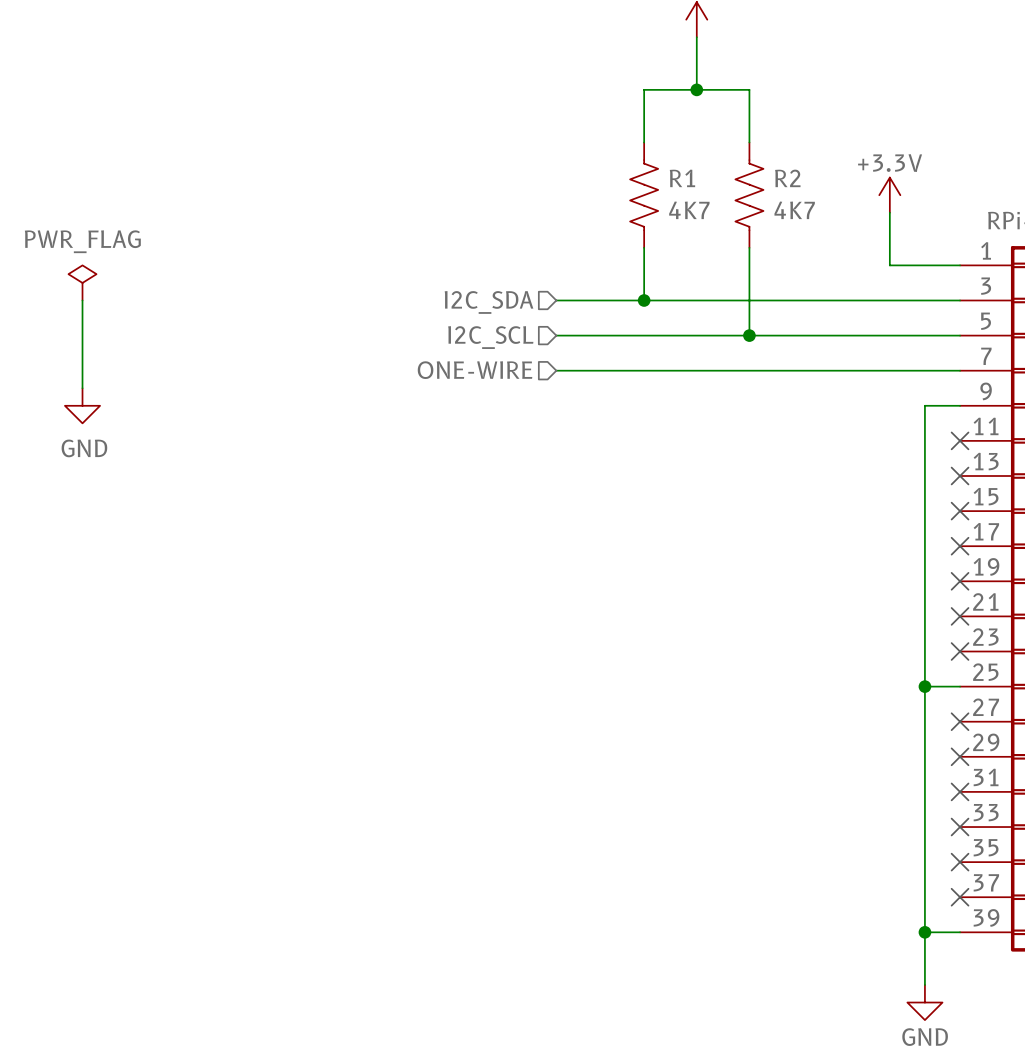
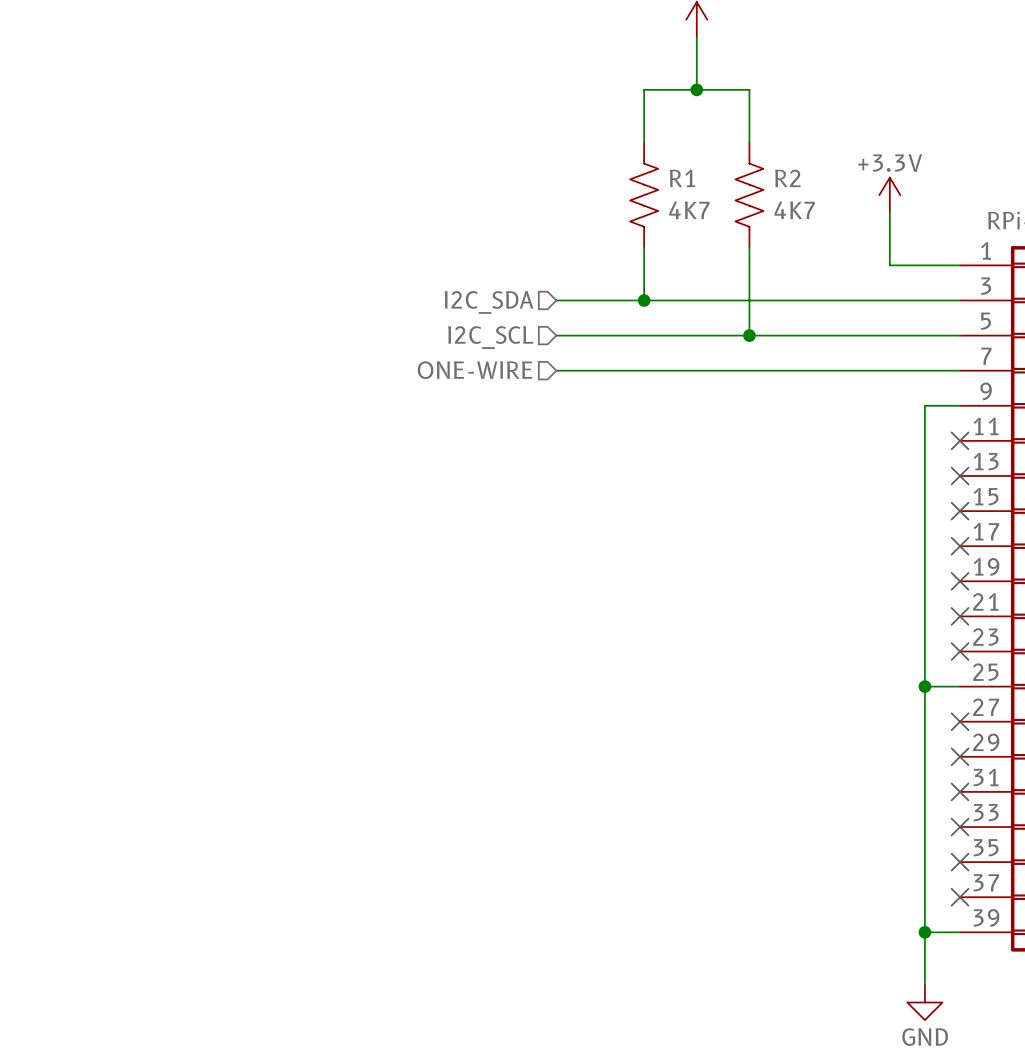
power symbol: PWR_FLAG (82, 282) -> none
wire: (82, 300) (82, 388) -> none
power symbol: GND (82, 405) -> none

